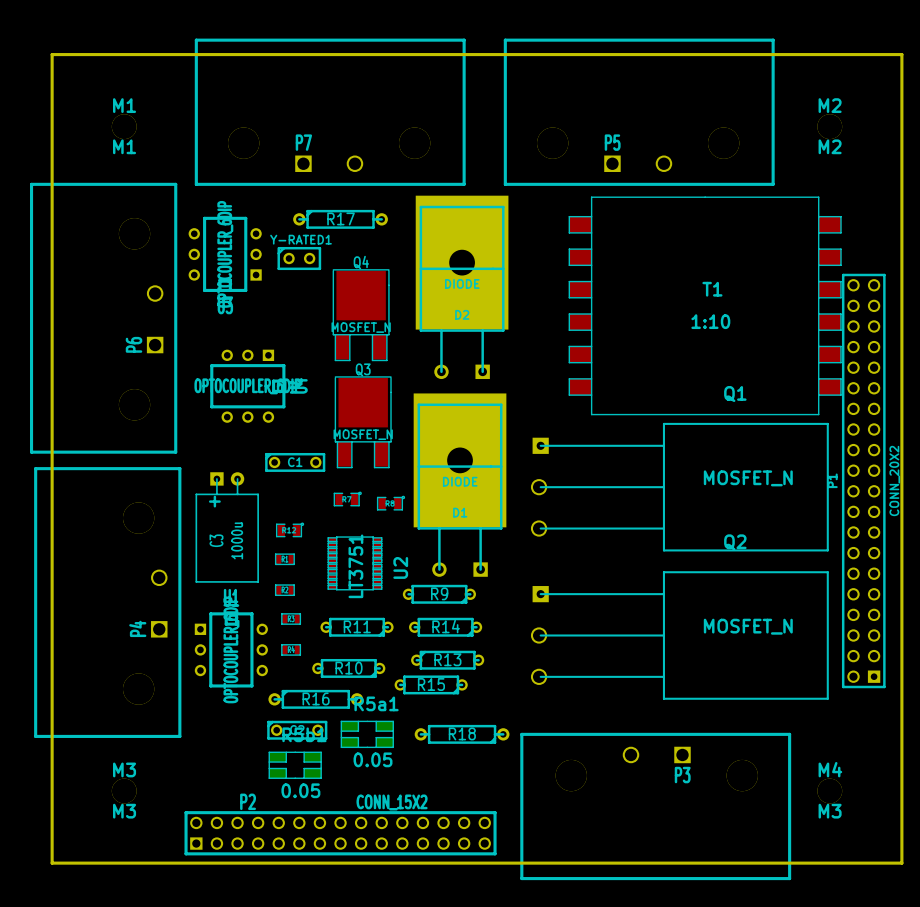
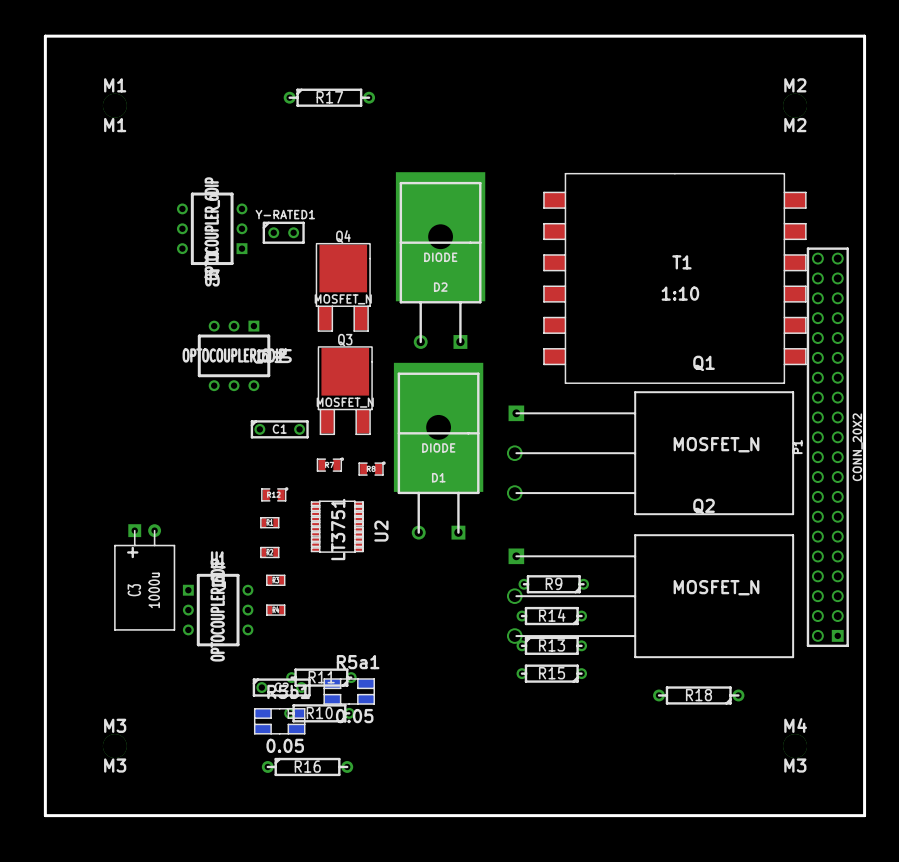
P7: (330, 112) -> none
P5: (639, 112) -> none
R17 position: (340, 219) -> (329, 97)
P6: (103, 318) -> none
C3 position: (227, 527) -> (144, 577)
R9 position: (439, 594) -> (553, 584)
P4: (107, 602) -> none
R11 position: (357, 627) -> (321, 677)
R14 position: (445, 627) -> (551, 616)
R13 position: (447, 660) -> (551, 645)
R10 position: (348, 668) -> (319, 713)
R15 position: (431, 684) -> (551, 673)
R16 position: (315, 699) -> (307, 766)
R18 position: (462, 734) -> (698, 695)
P3: (655, 806) -> none
P2: CONN_15X2 (340, 833) -> none

